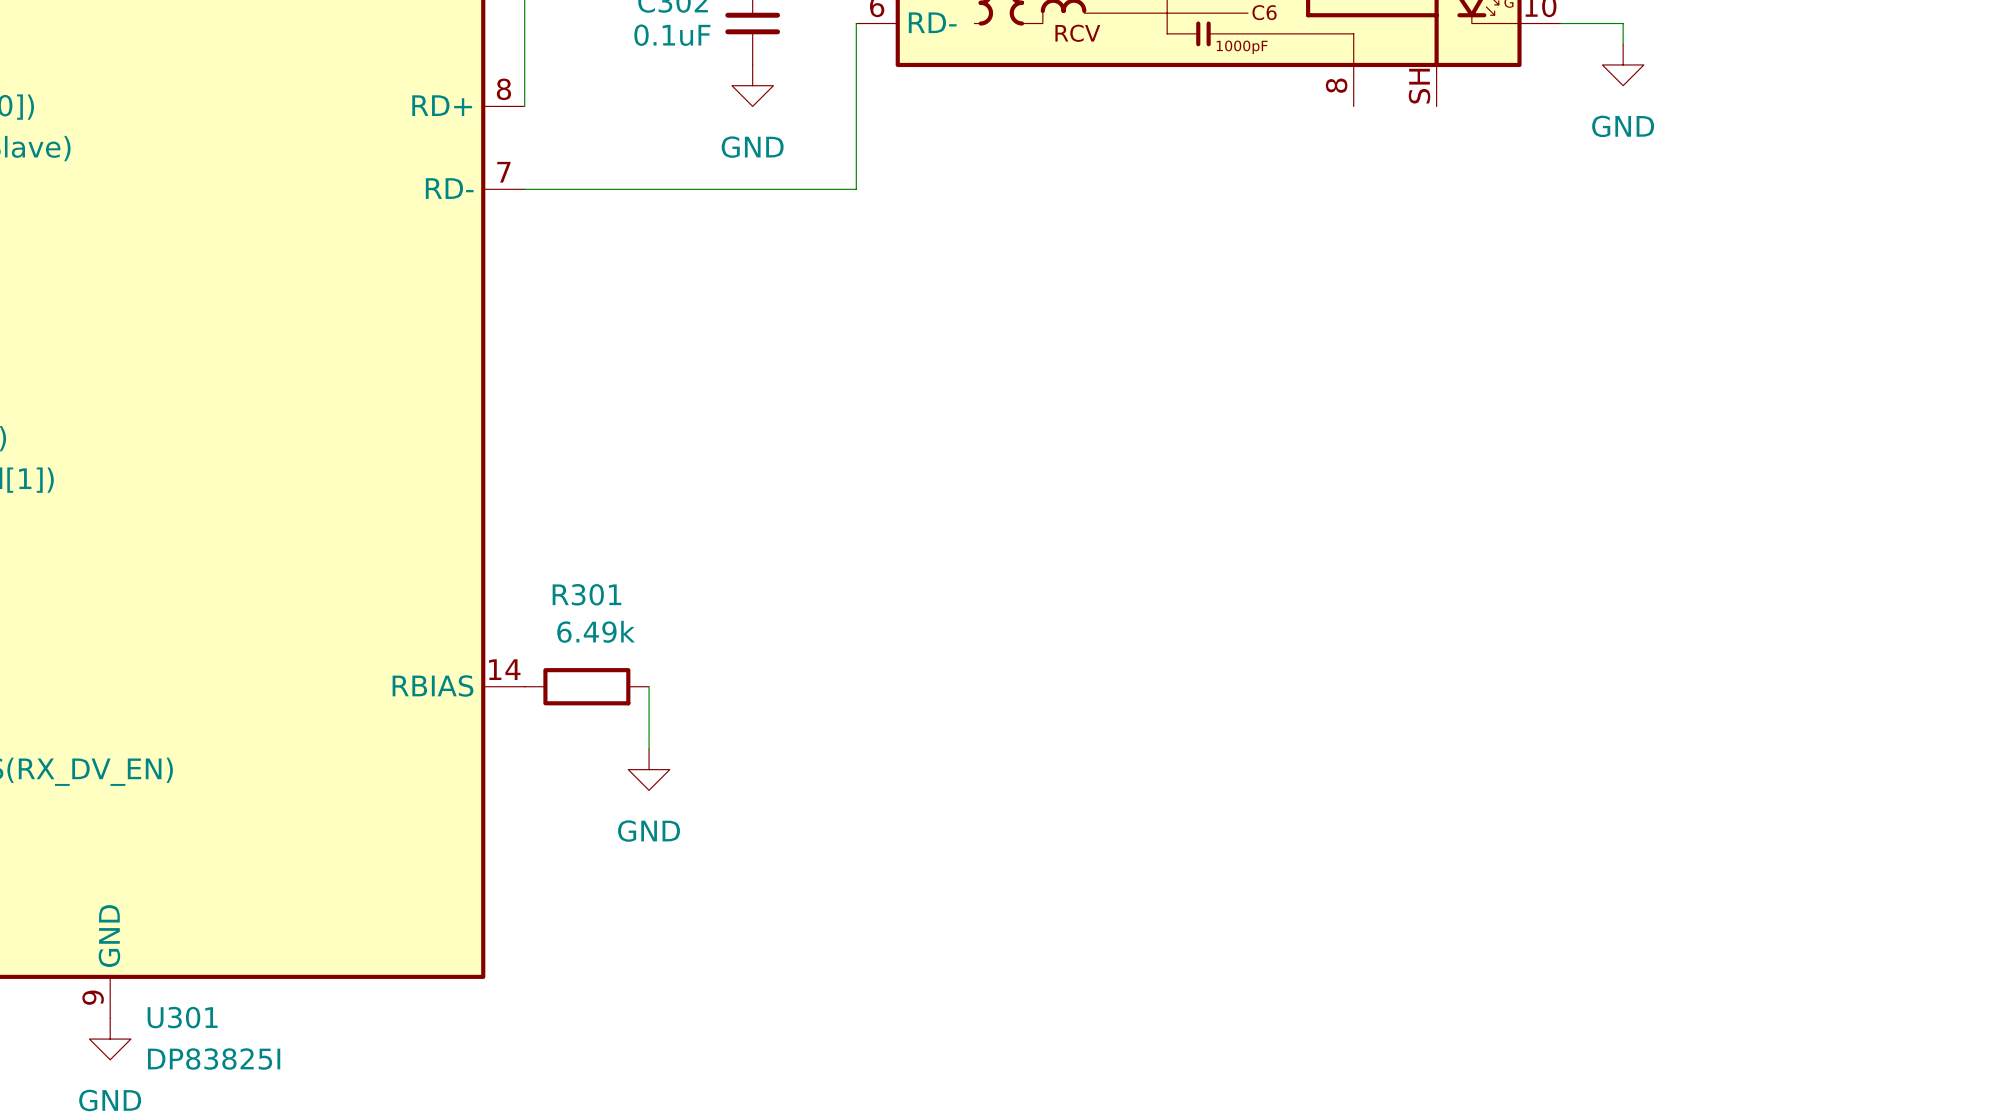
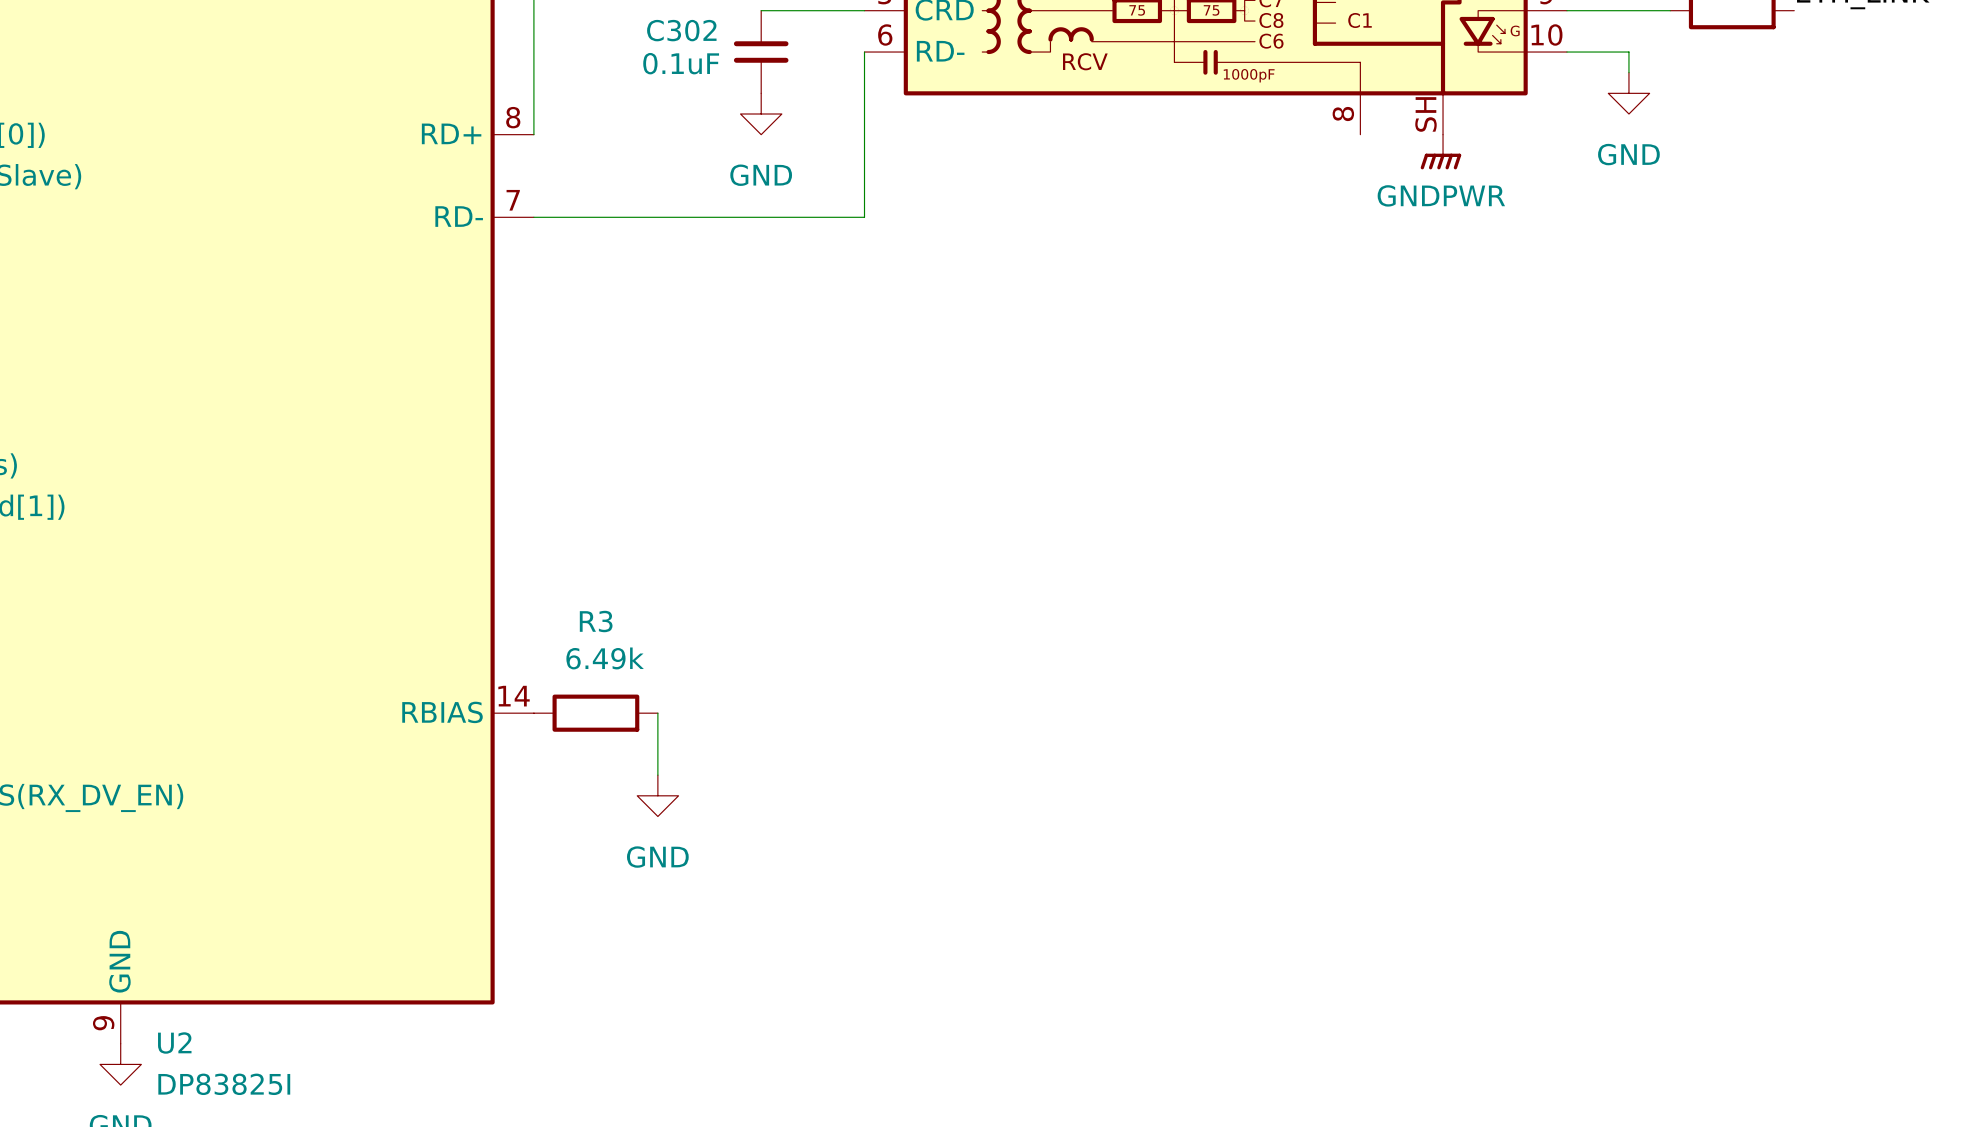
power symbol: none -> GNDPWR (1440, 152)
R301 name: R301 (586, 594) -> R3 (596, 621)
U301 name: U301 (182, 1017) -> U2 (174, 1042)

